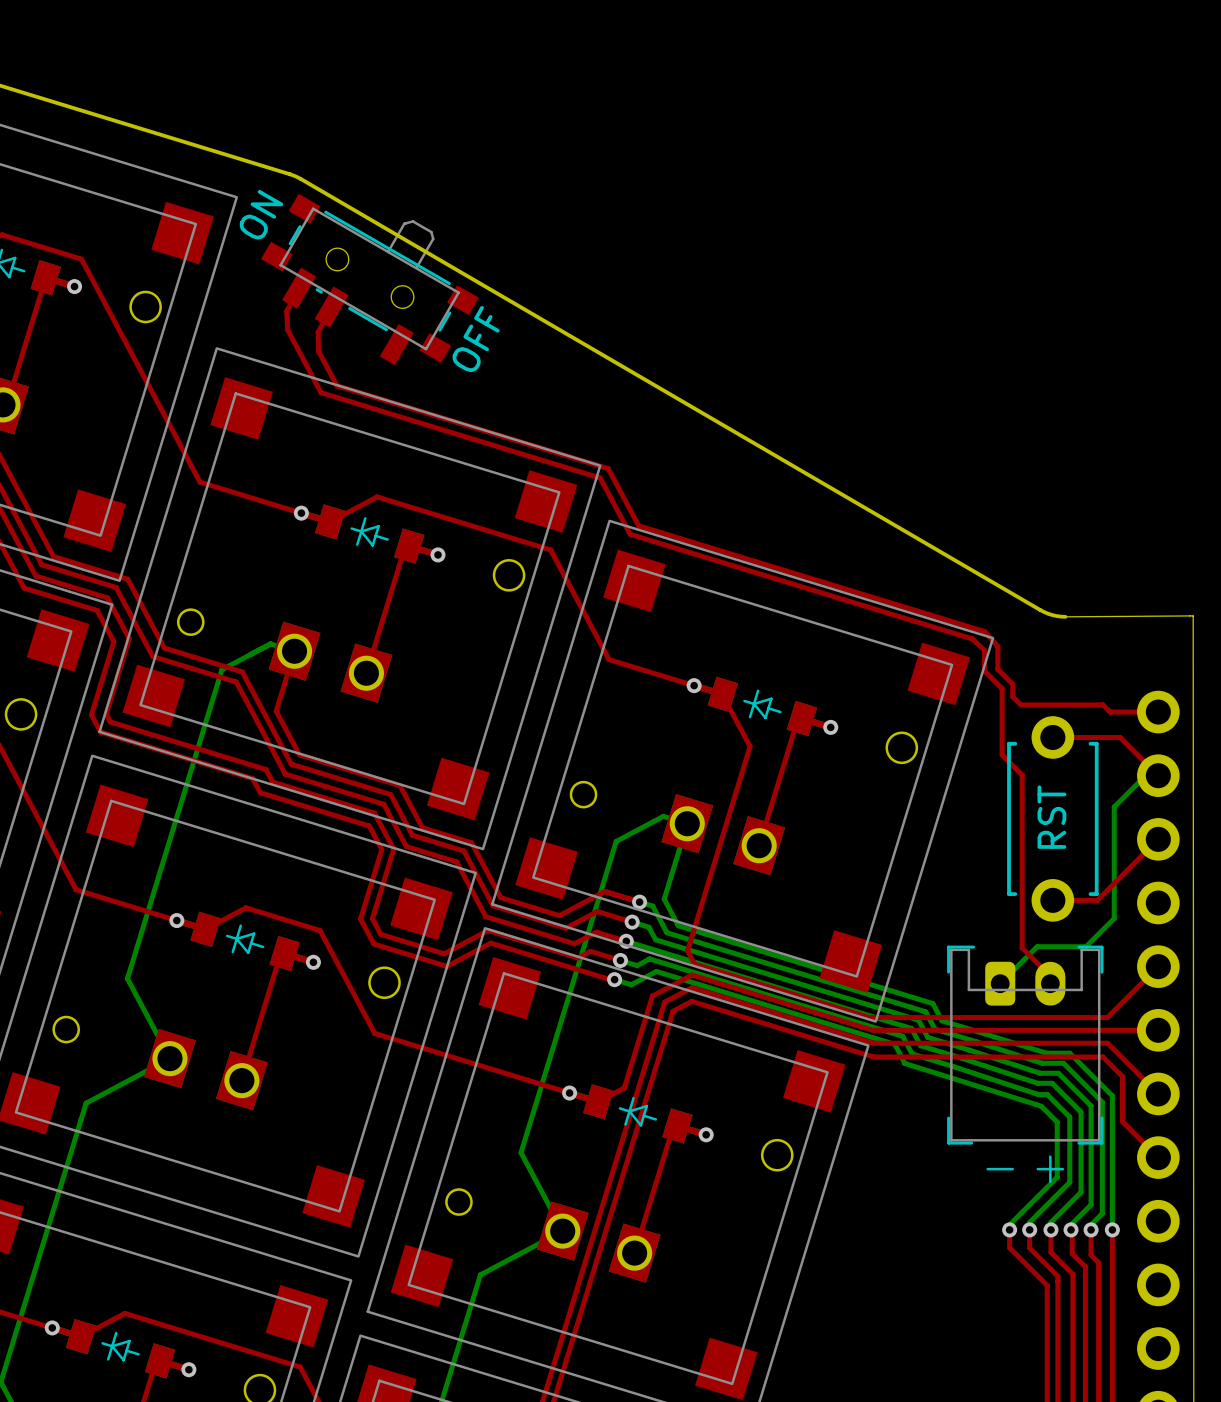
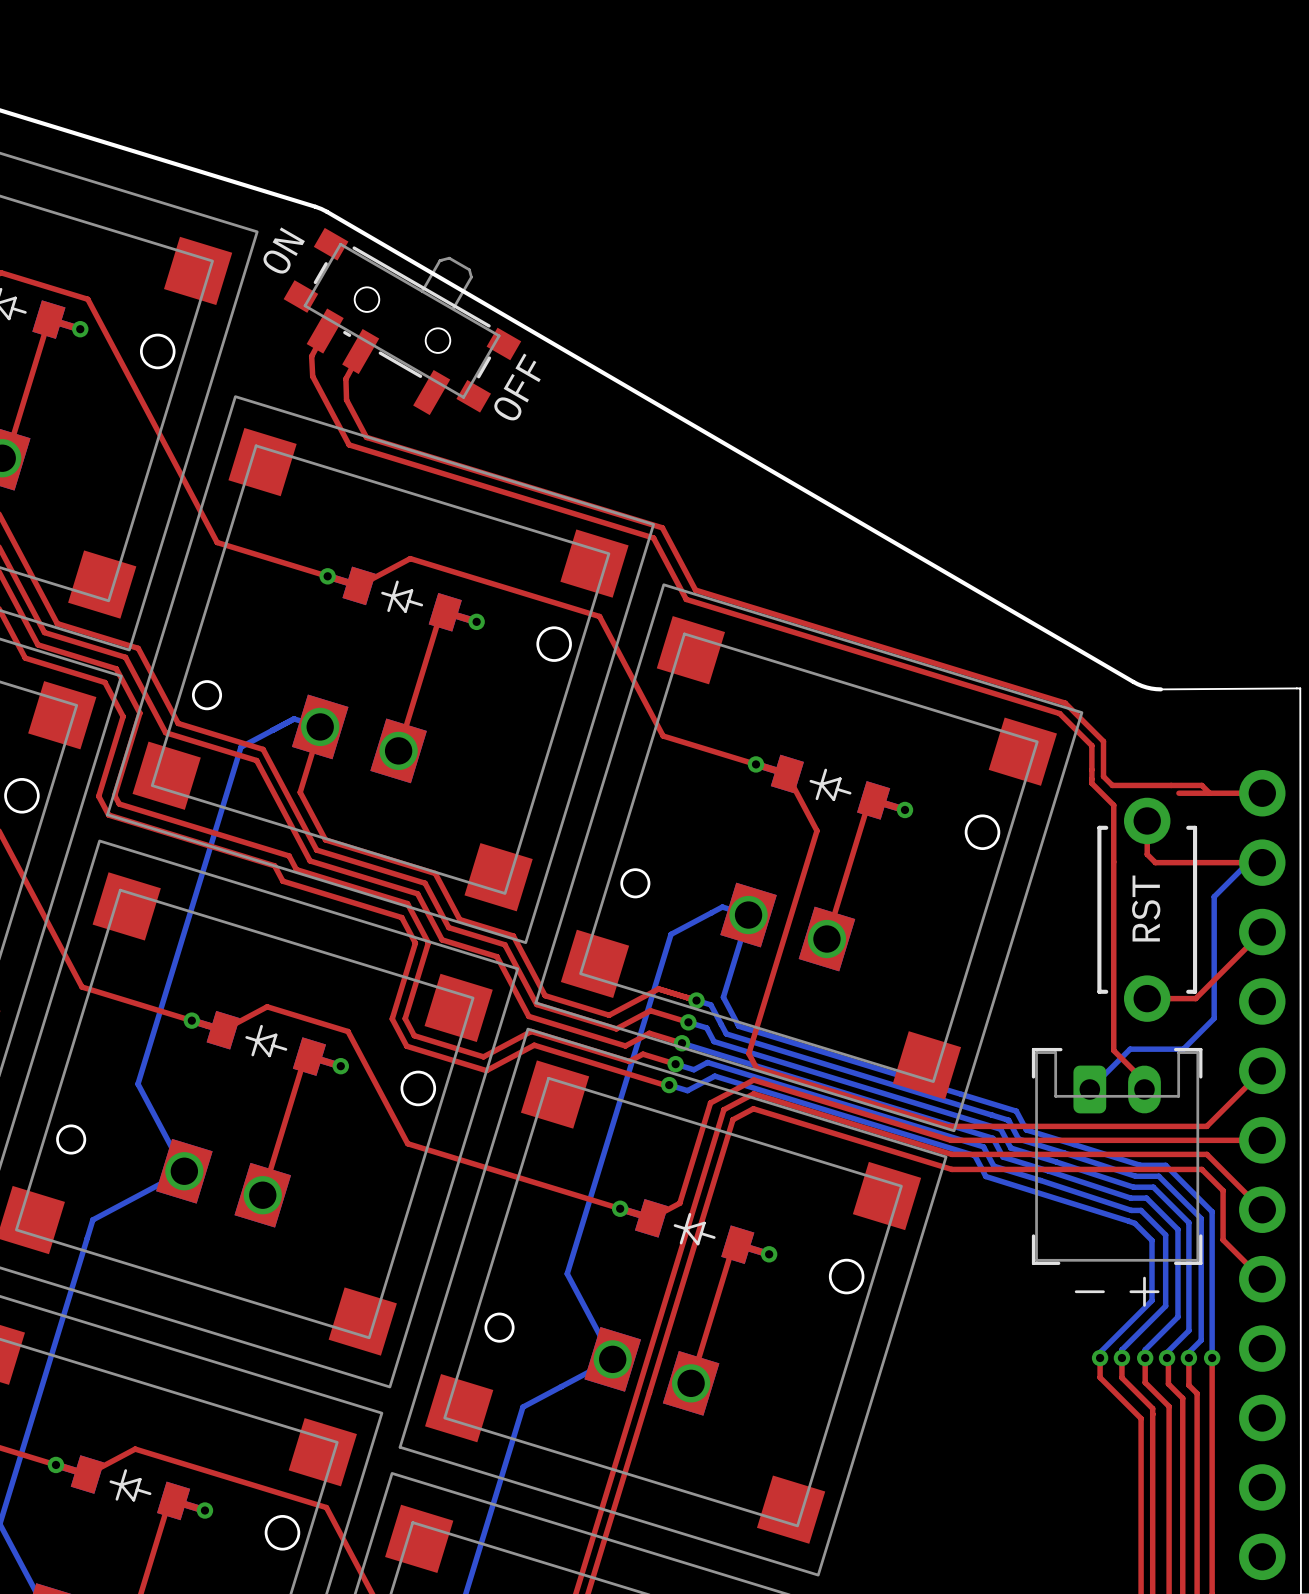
top track: (977, 629) (984, 631) (997, 646) (997, 669) (1012, 684) -> (1065, 703) (1103, 741) (1103, 762)
top track: (972, 639) (984, 650) (984, 670) (1002, 688) -> (1059, 713) (1091, 745) (1091, 767)
top track: (1002, 703) (1002, 755) (1022, 775) -> (1091, 783) (1113, 805) (1113, 861)
top track: (1052, 737) (1120, 737) (1158, 775) -> (1147, 820) (1147, 854) (1155, 862) (1262, 862)

